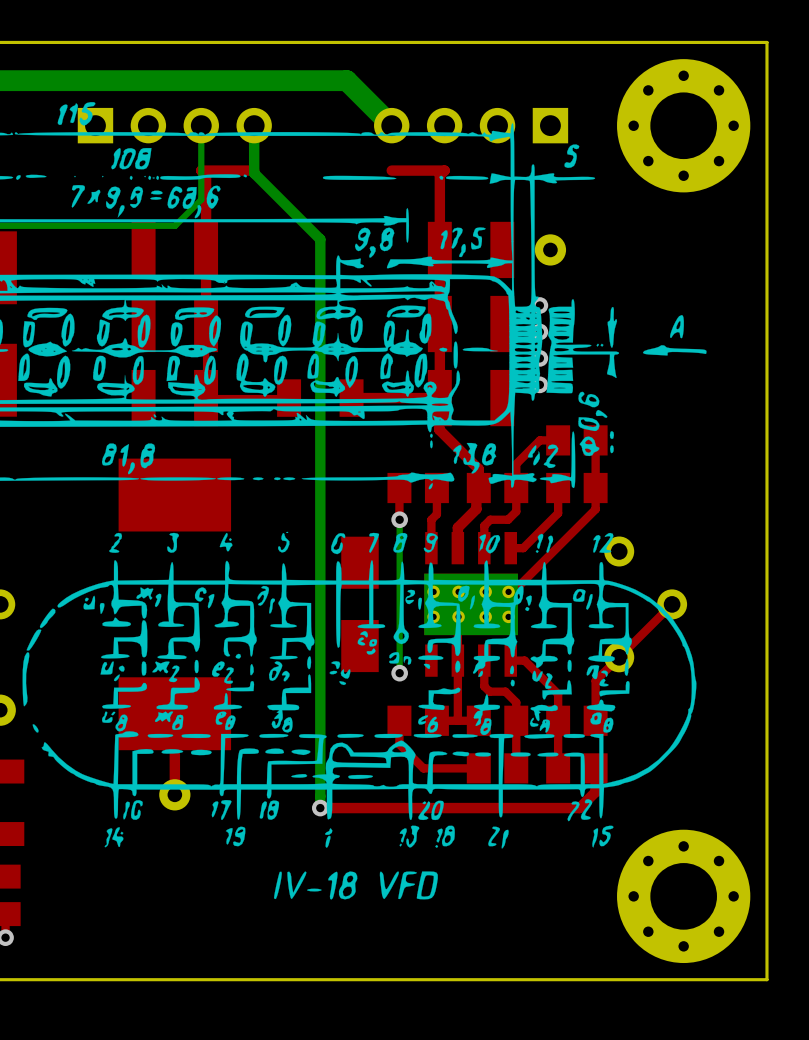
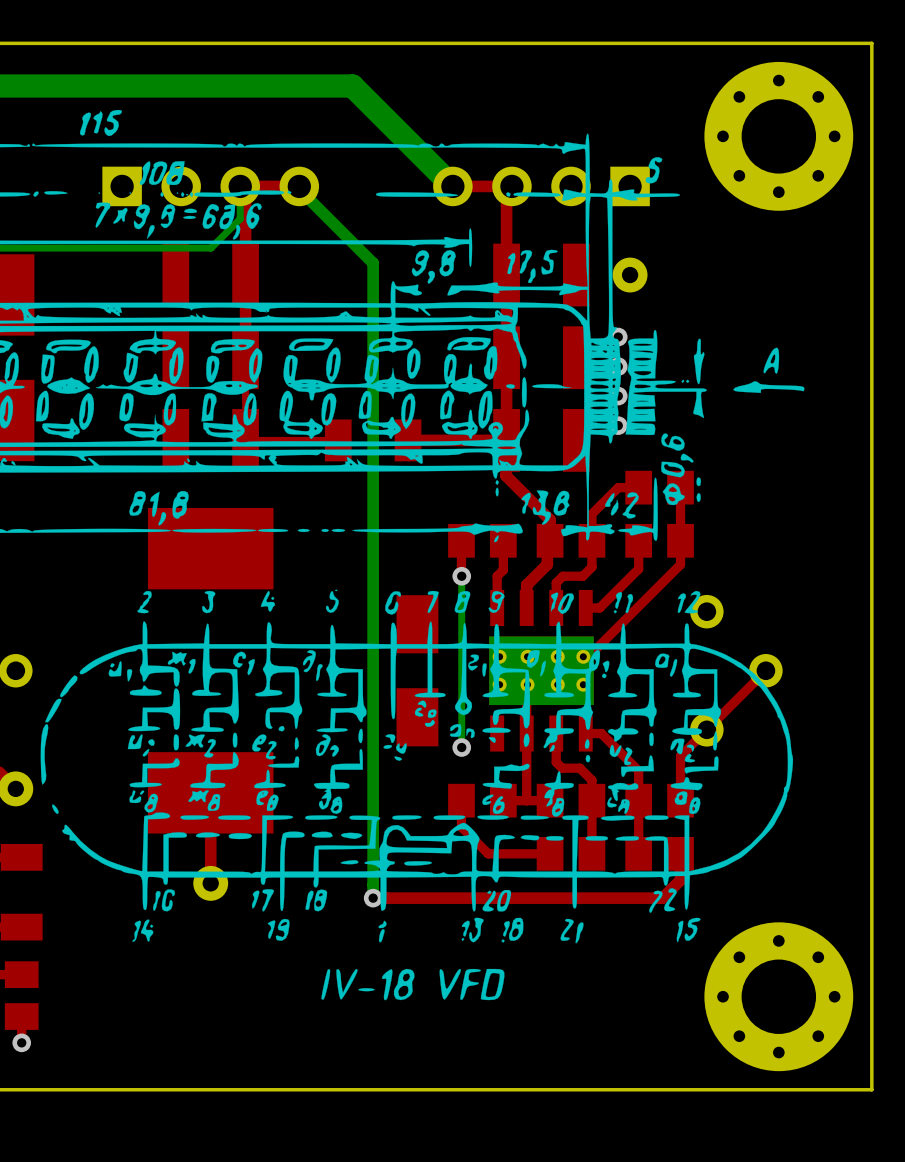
bottom track: (301, 80) (346, 80) (391, 125) -> (352, 86) (452, 186)
part position: (174, 125) -> (210, 186)
bottom track: (201, 125) (201, 170) -> none
bottom track: (254, 125) (254, 173) -> none
part position: (471, 125) -> (541, 186)

